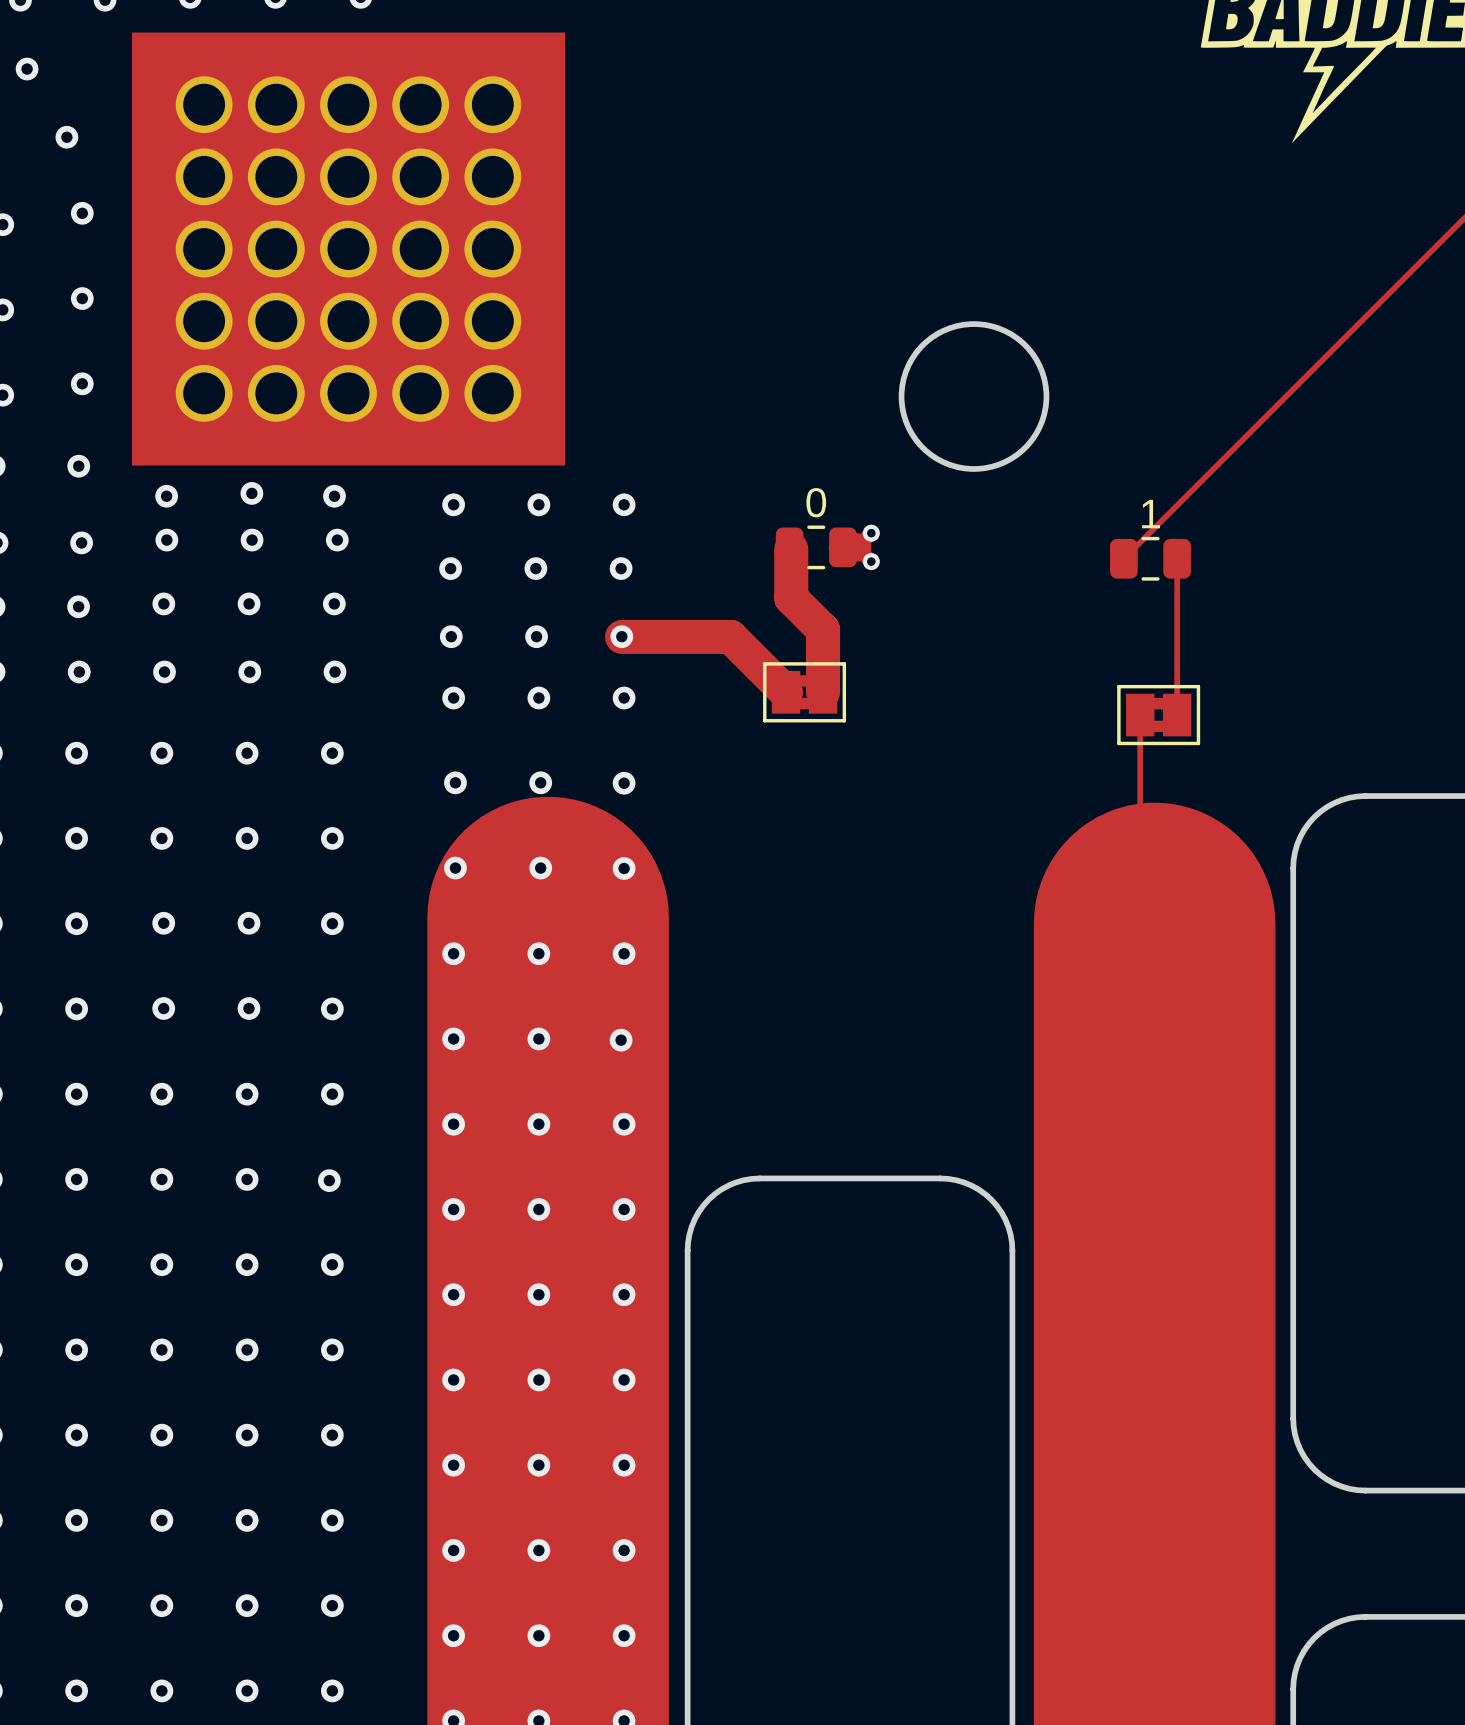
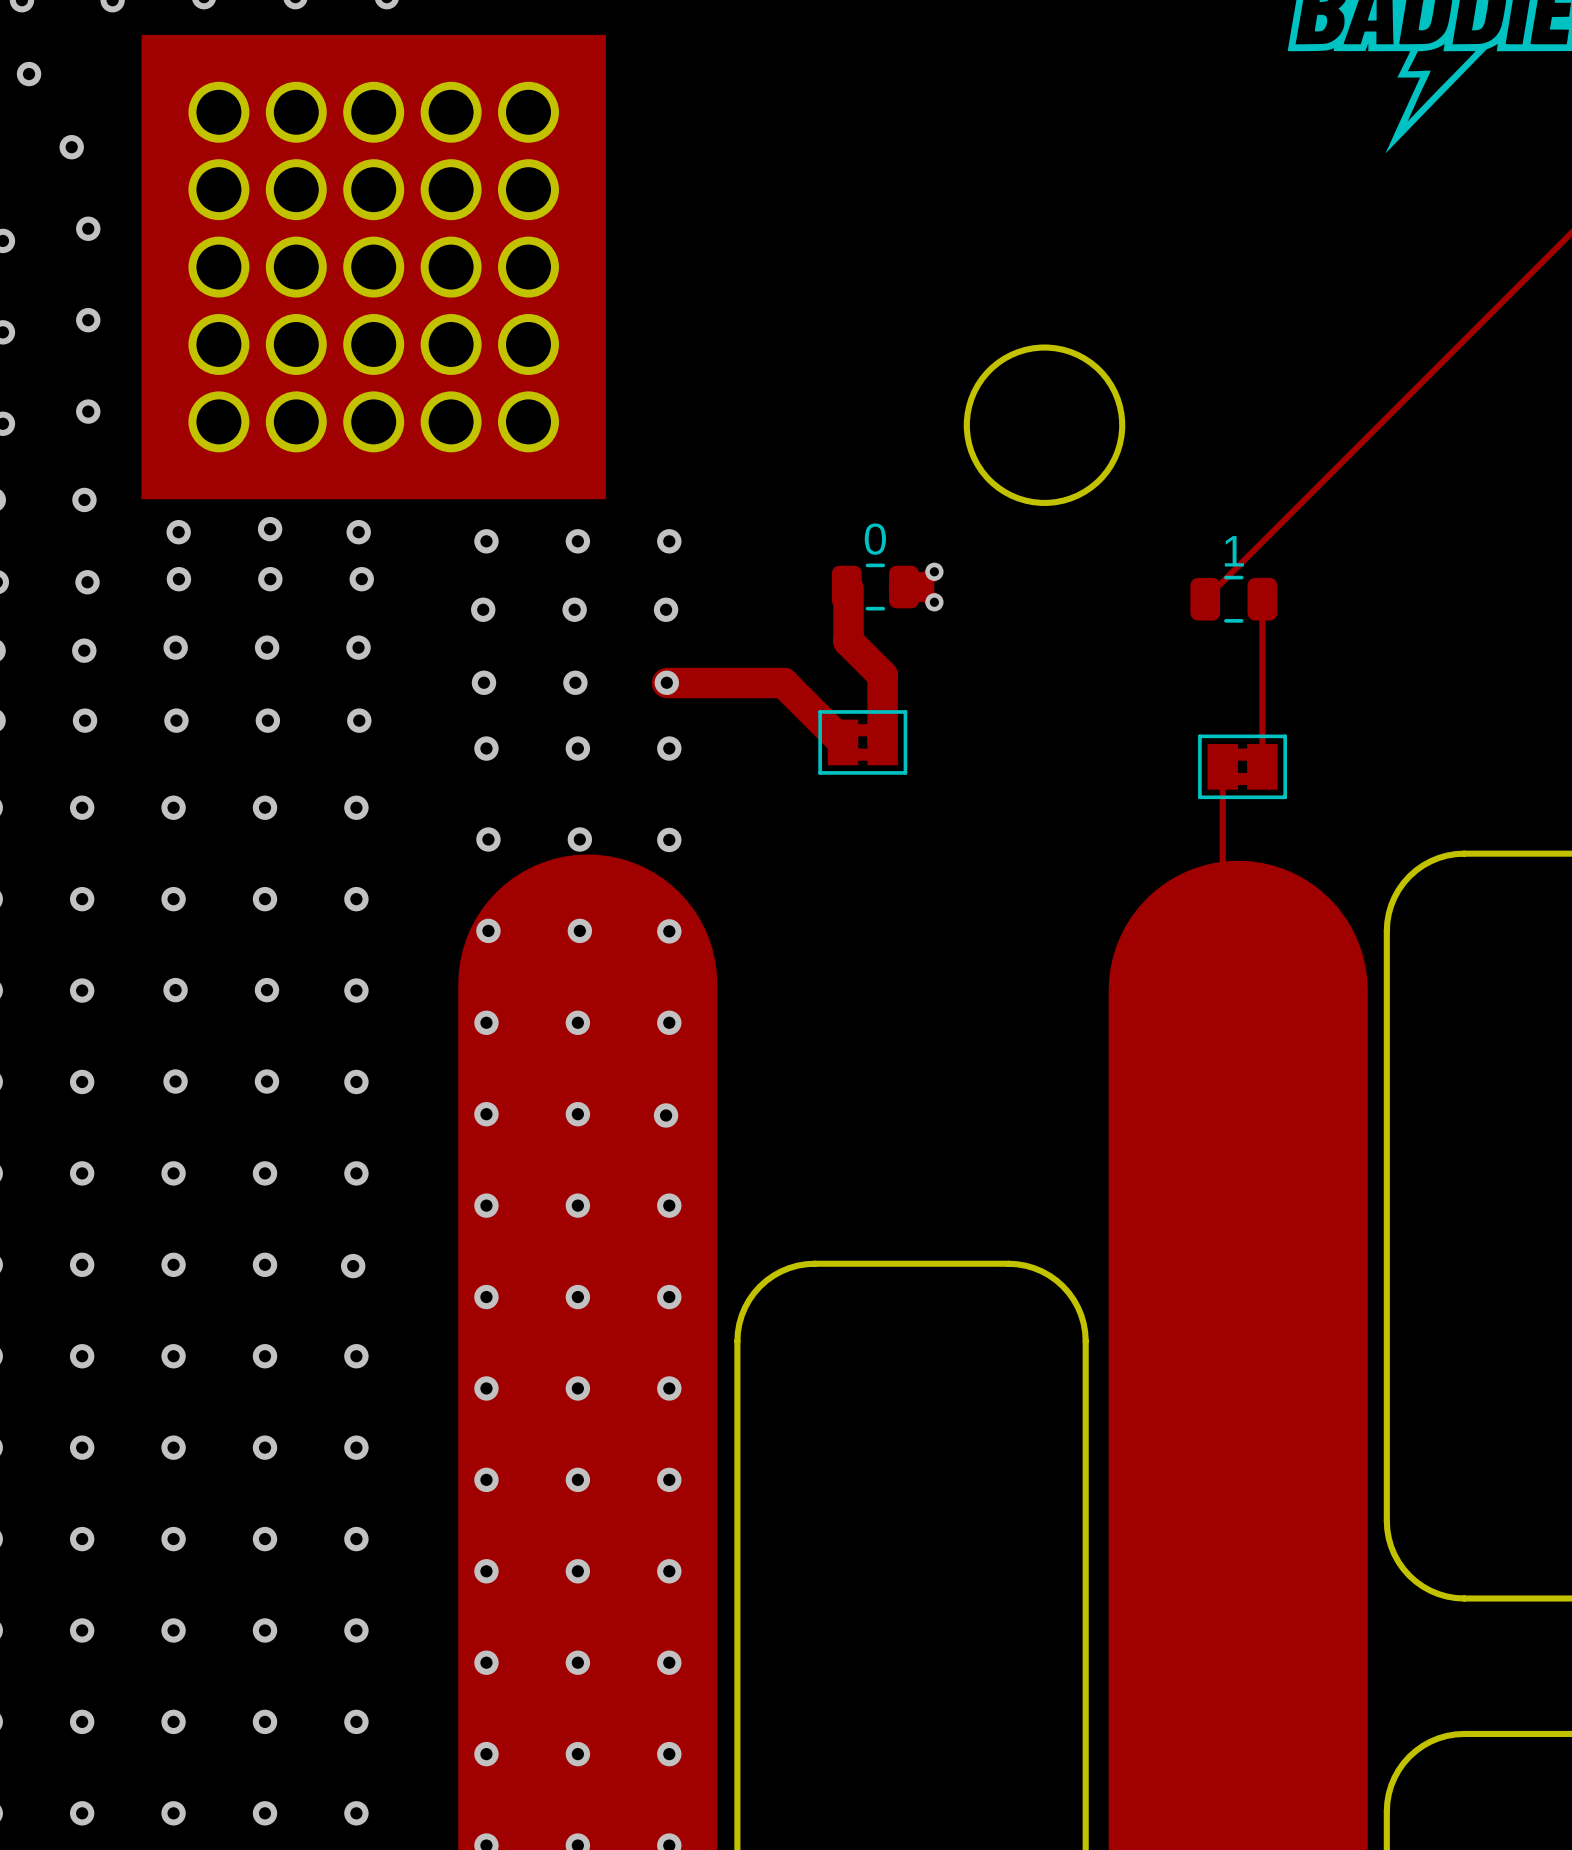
track width: thick (791, 549) (791, 598) (823, 629) (823, 692) -> thin (848, 588) (848, 641) (882, 675) (882, 742)
track width: thick (622, 636) (730, 636) (786, 692) -> thin (667, 683) (783, 683) (842, 742)

